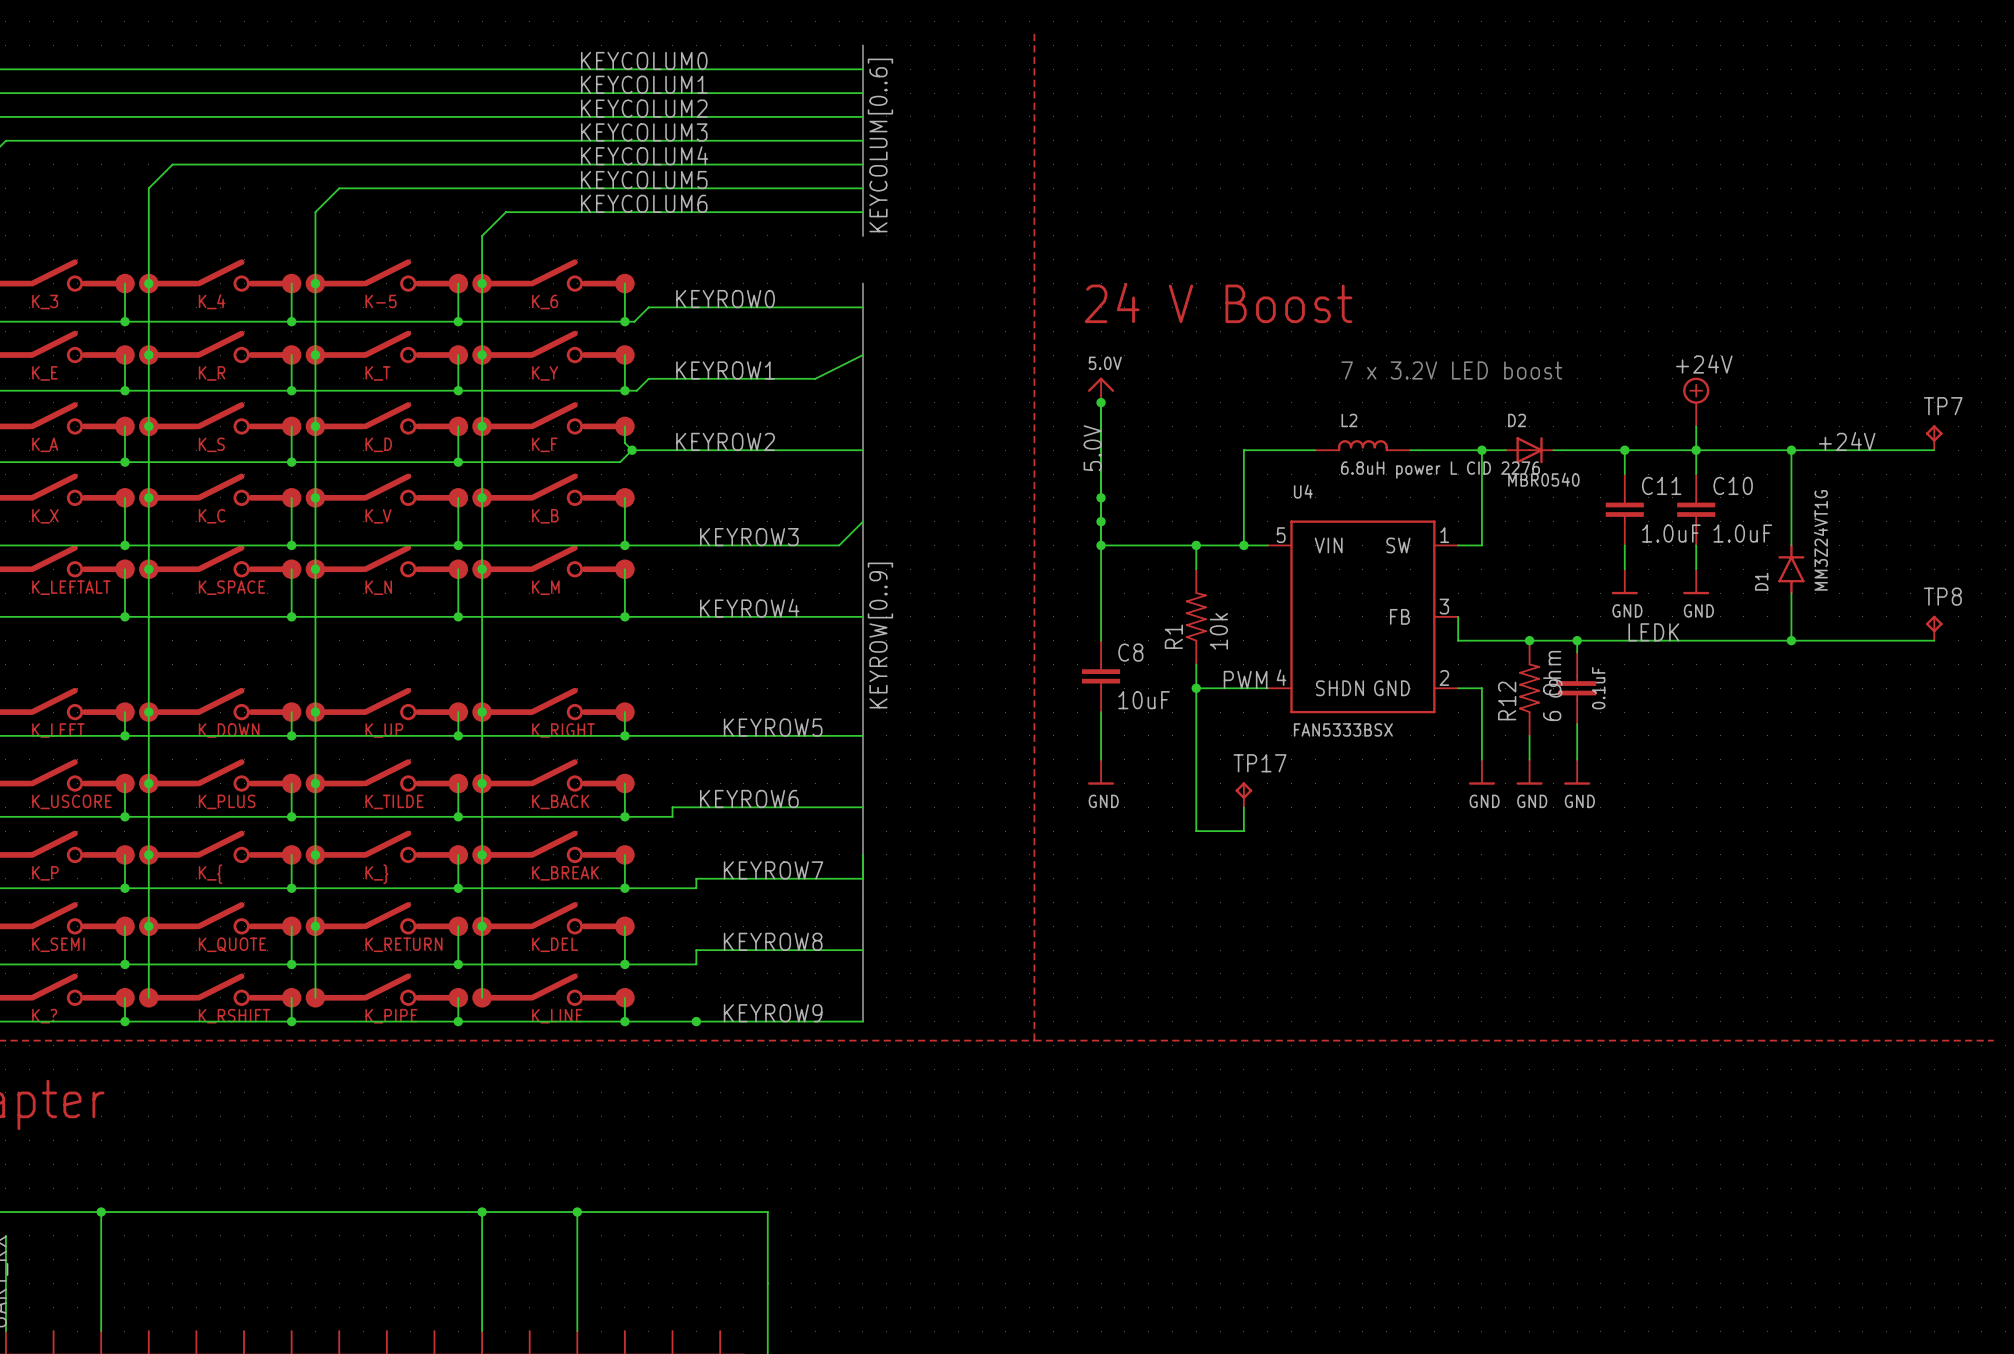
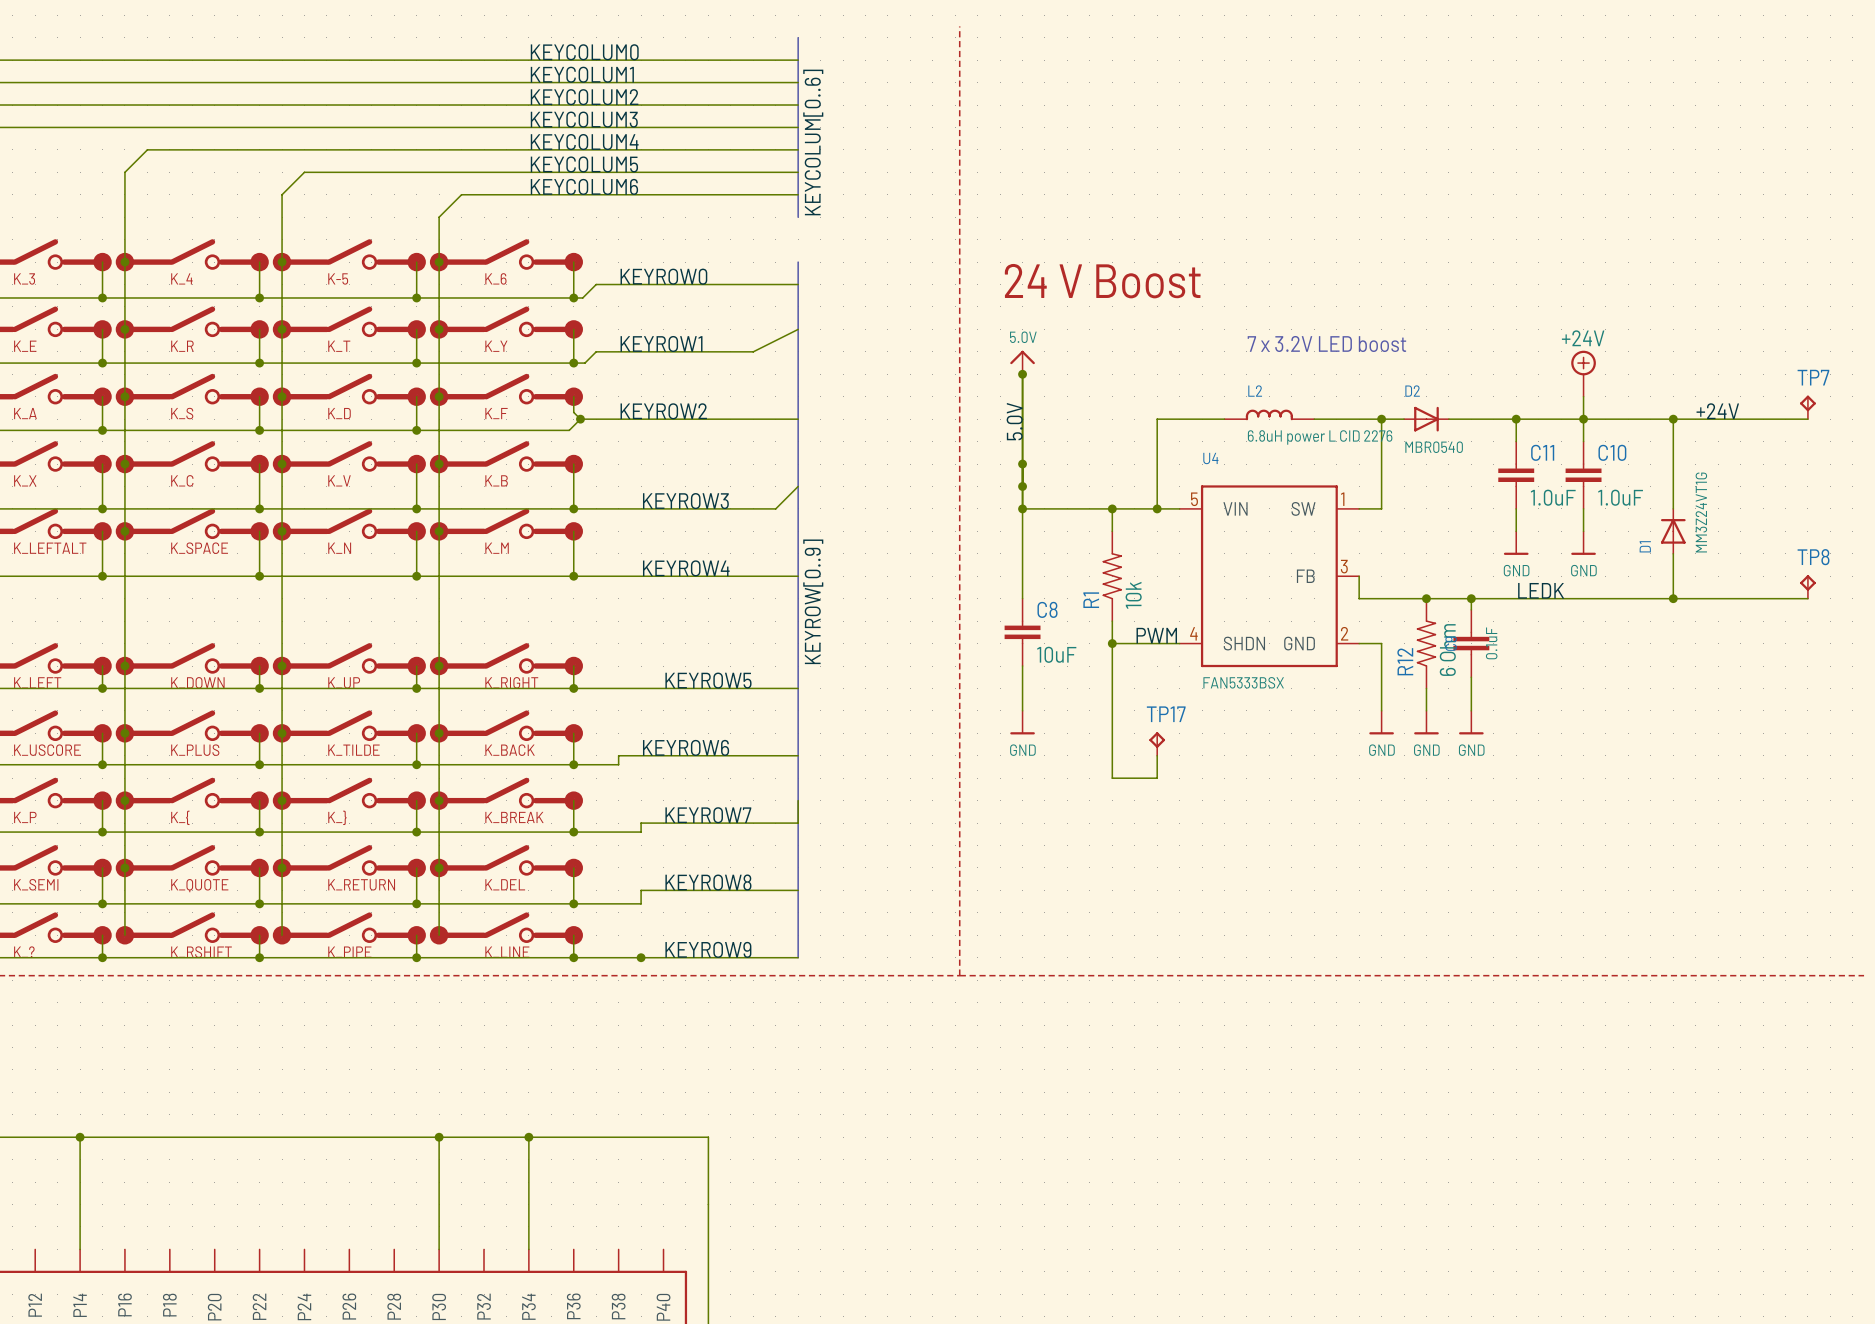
D1 symbol: [1778, 544, 1805, 595] -> [1660, 508, 1686, 554]

